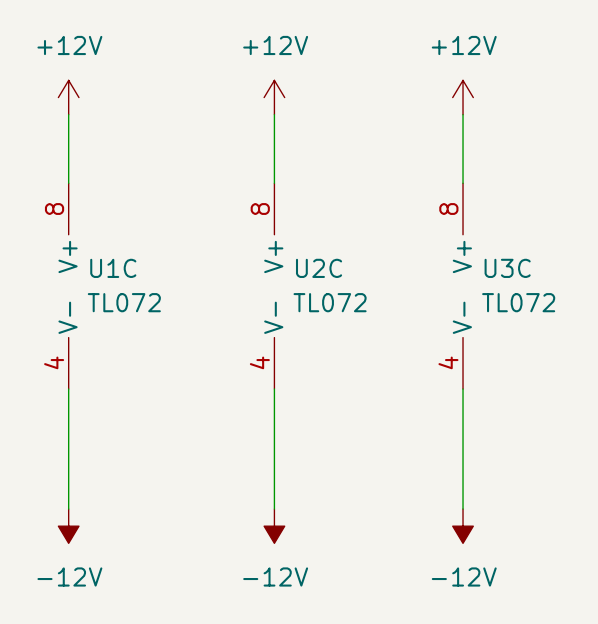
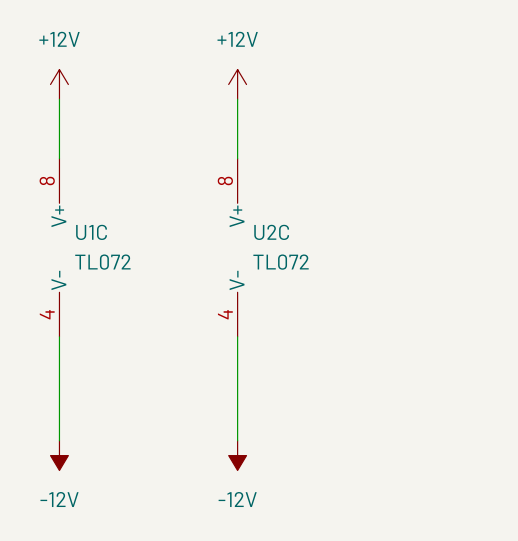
power symbol: +12V (463, 97) -> none
wire: (463, 114) (463, 183) -> none
U3C: TL072 (463, 286) -> none
wire: (463, 389) (463, 509) -> none
power symbol: -12V (463, 526) -> none

